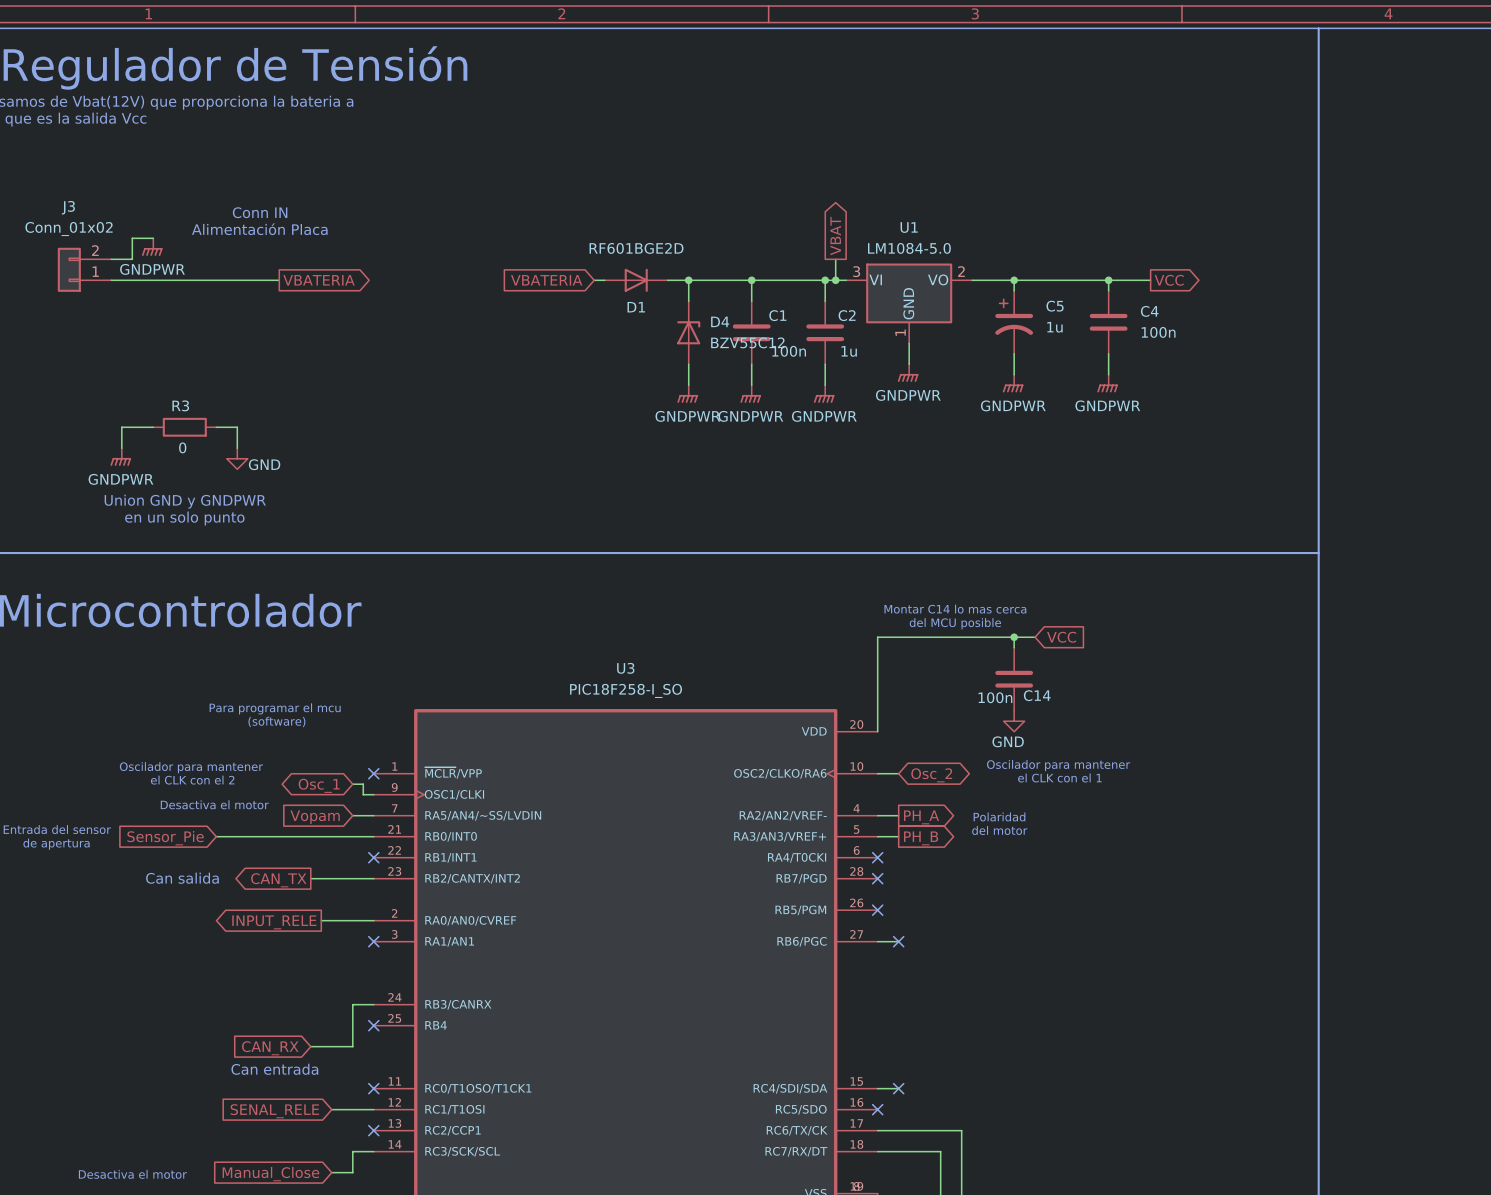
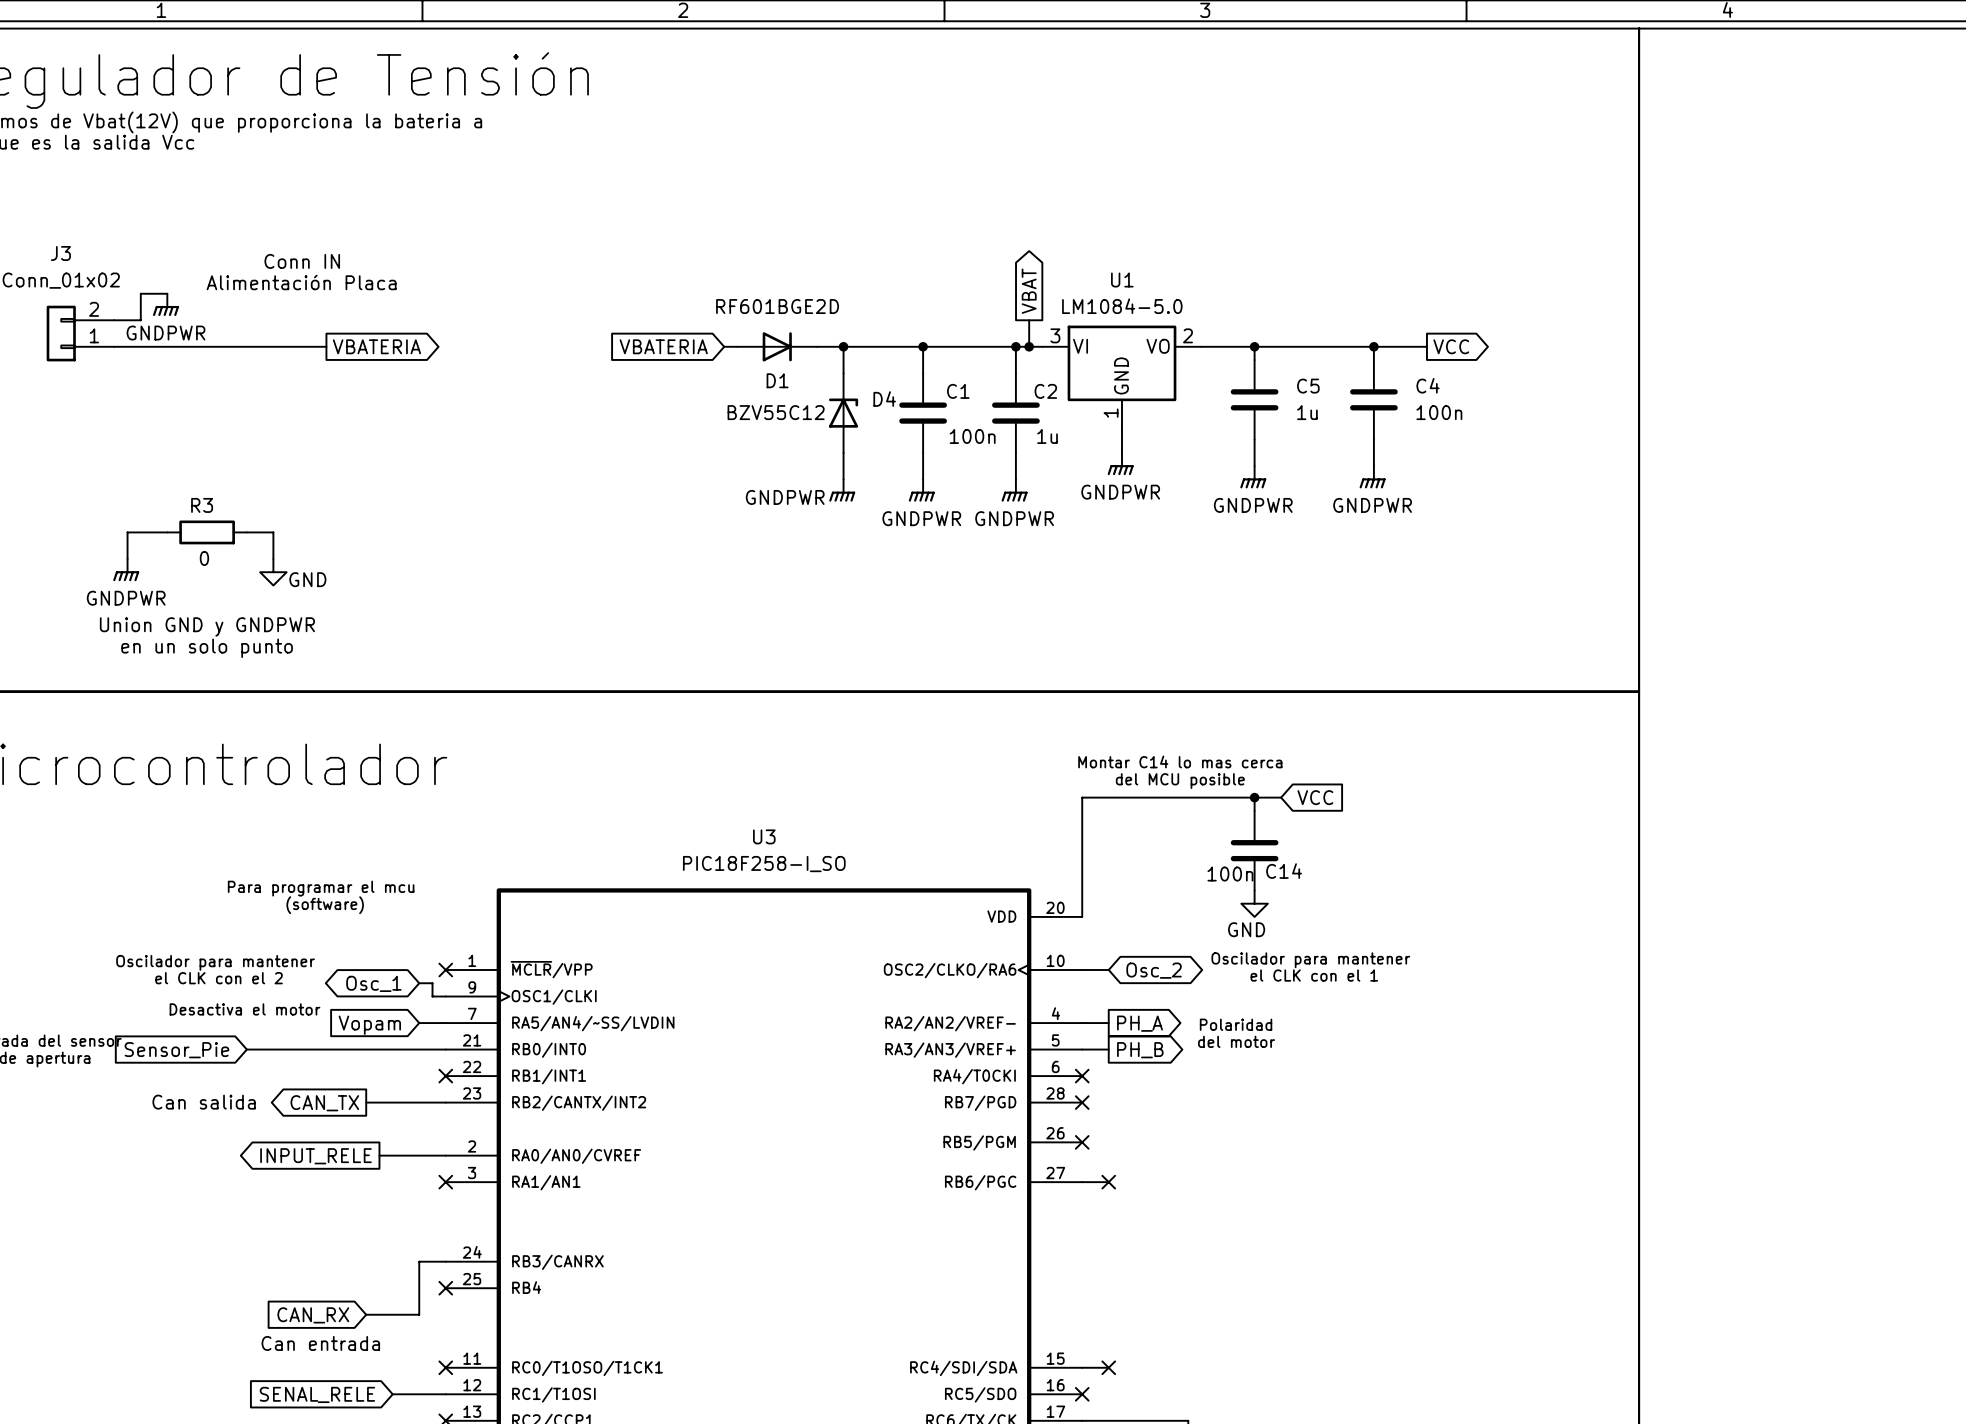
C5 symbol: [995, 290, 1034, 354] -> [1230, 360, 1279, 440]
D4 value position: BZV55C12 (747, 342) -> BZV55C12 (776, 412)
power symbol text position: GNDPWR (687, 416) -> GNDPWR (785, 497)

